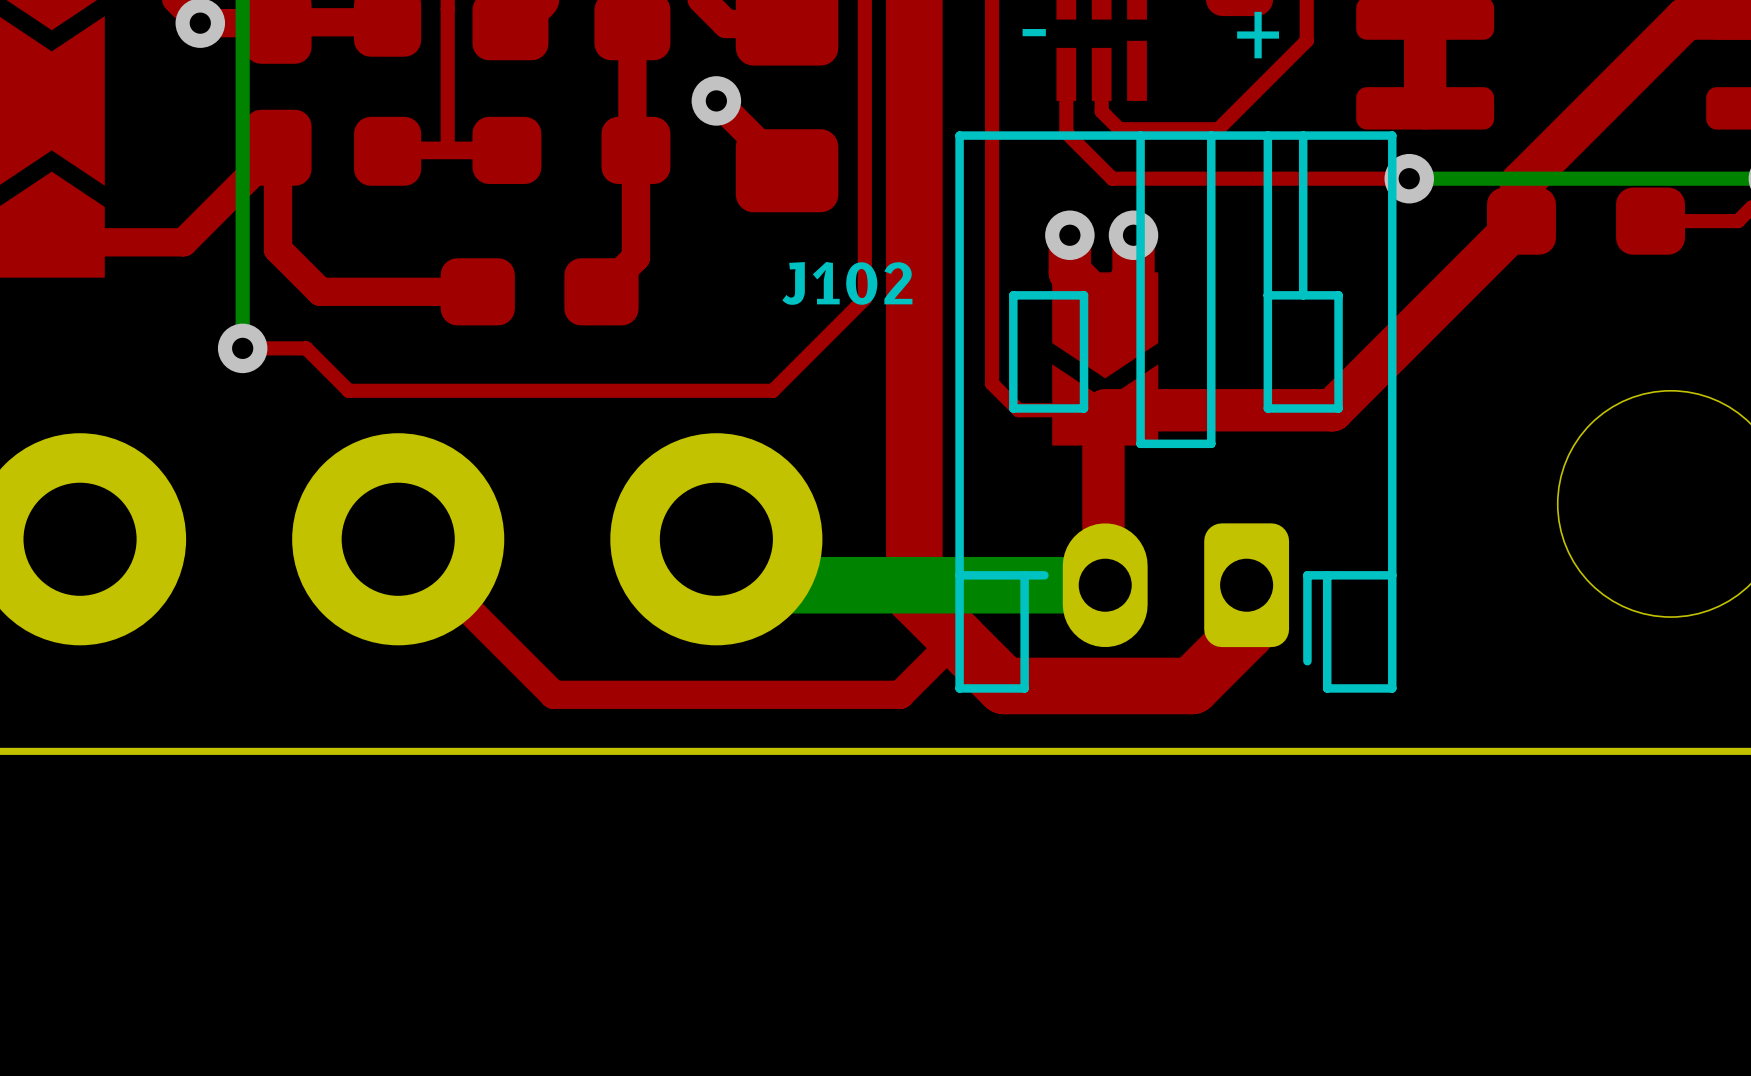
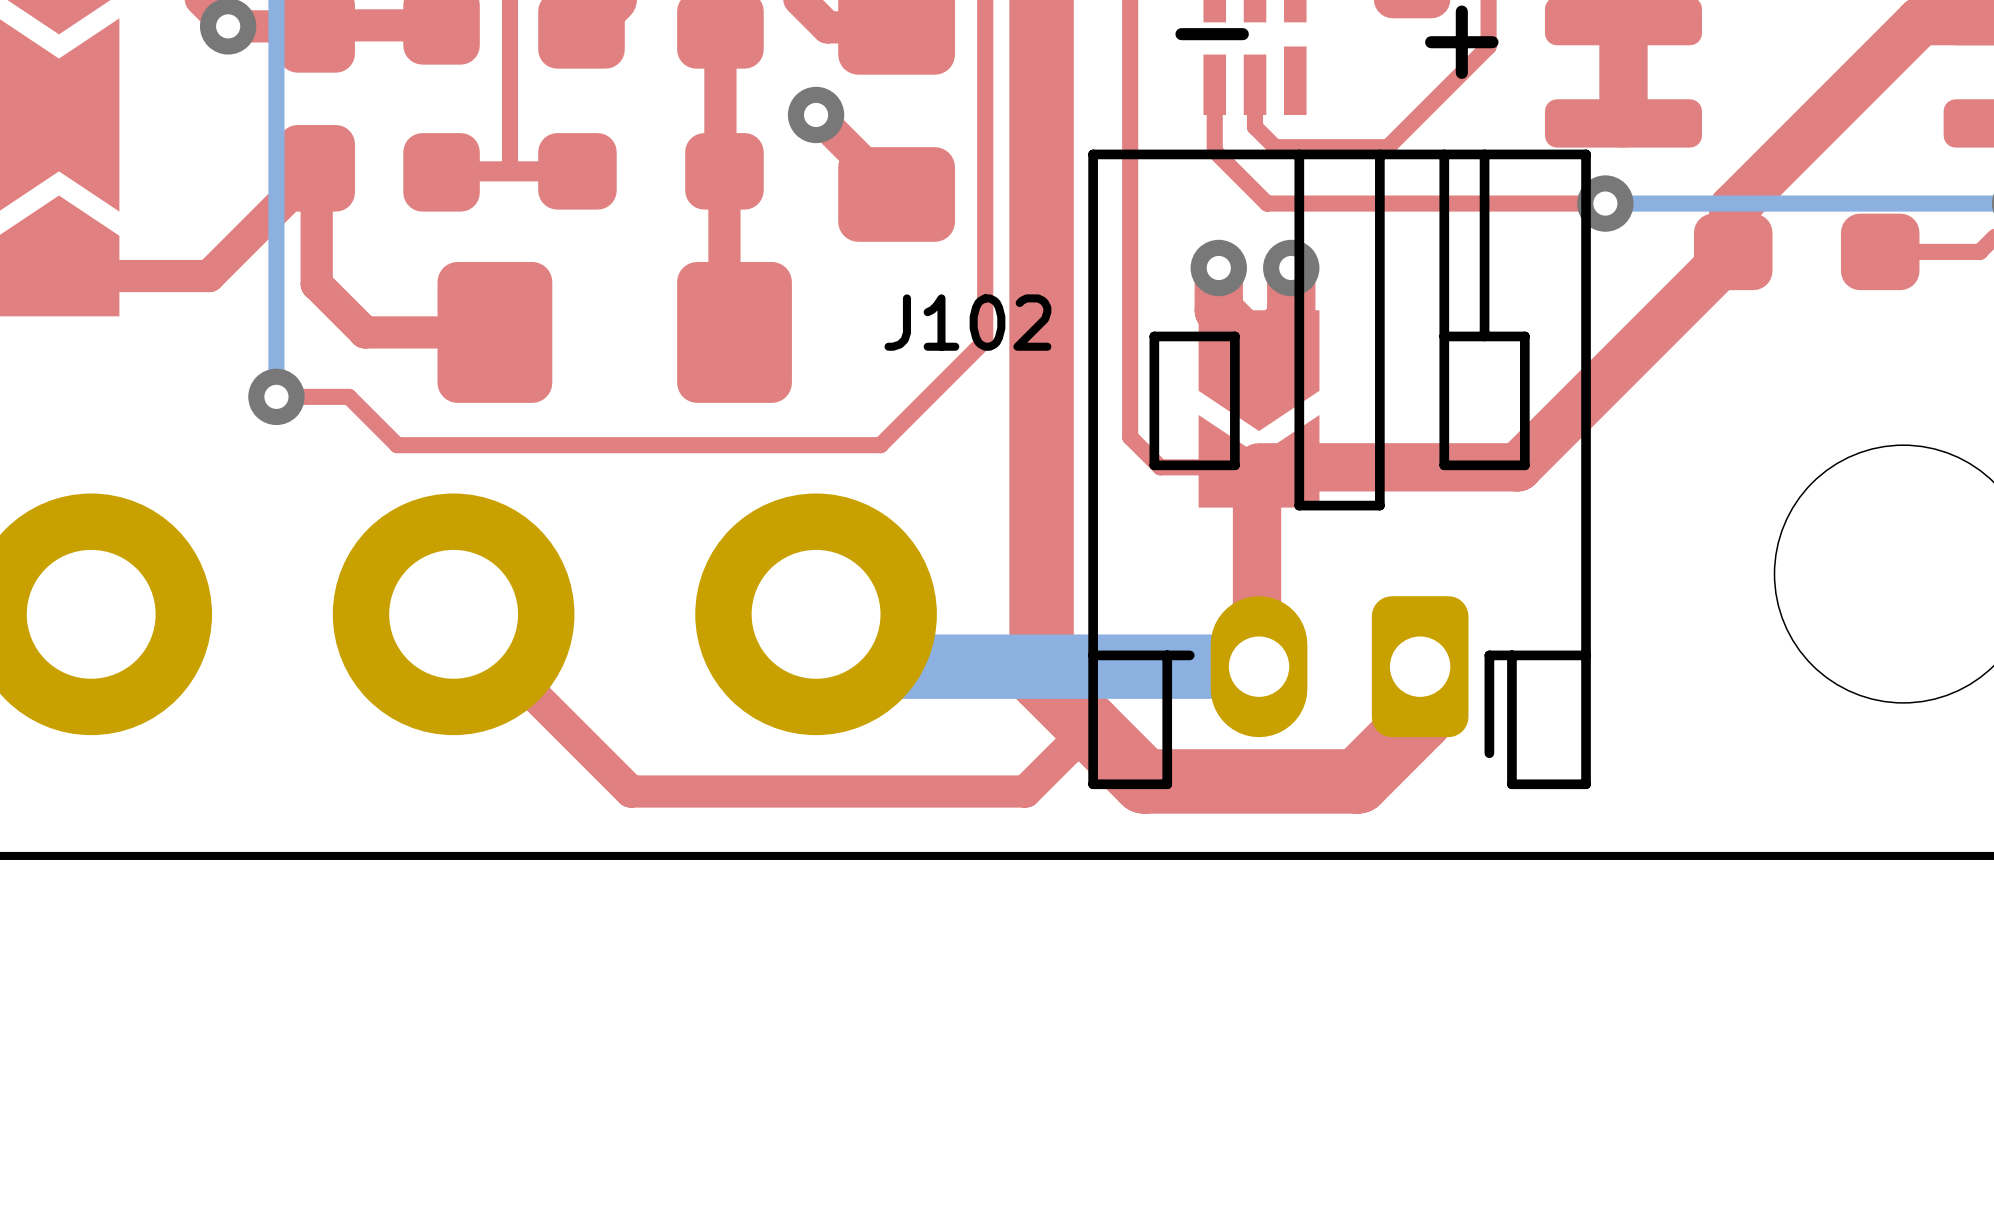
part footprint: [440, 258, 639, 326] -> [437, 261, 792, 403]

